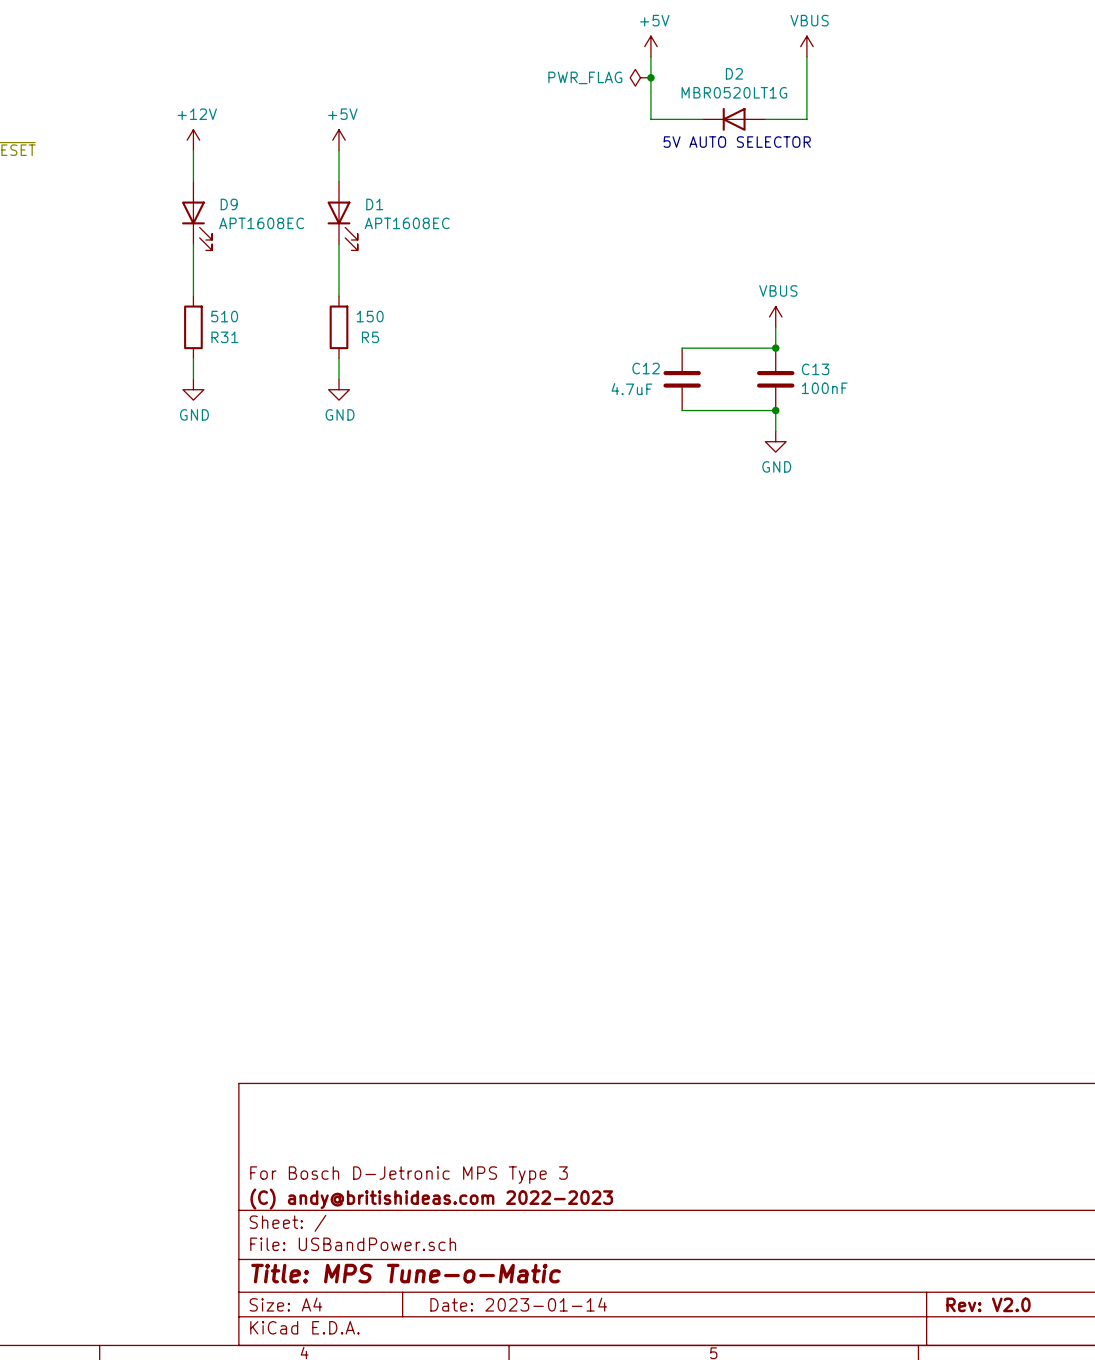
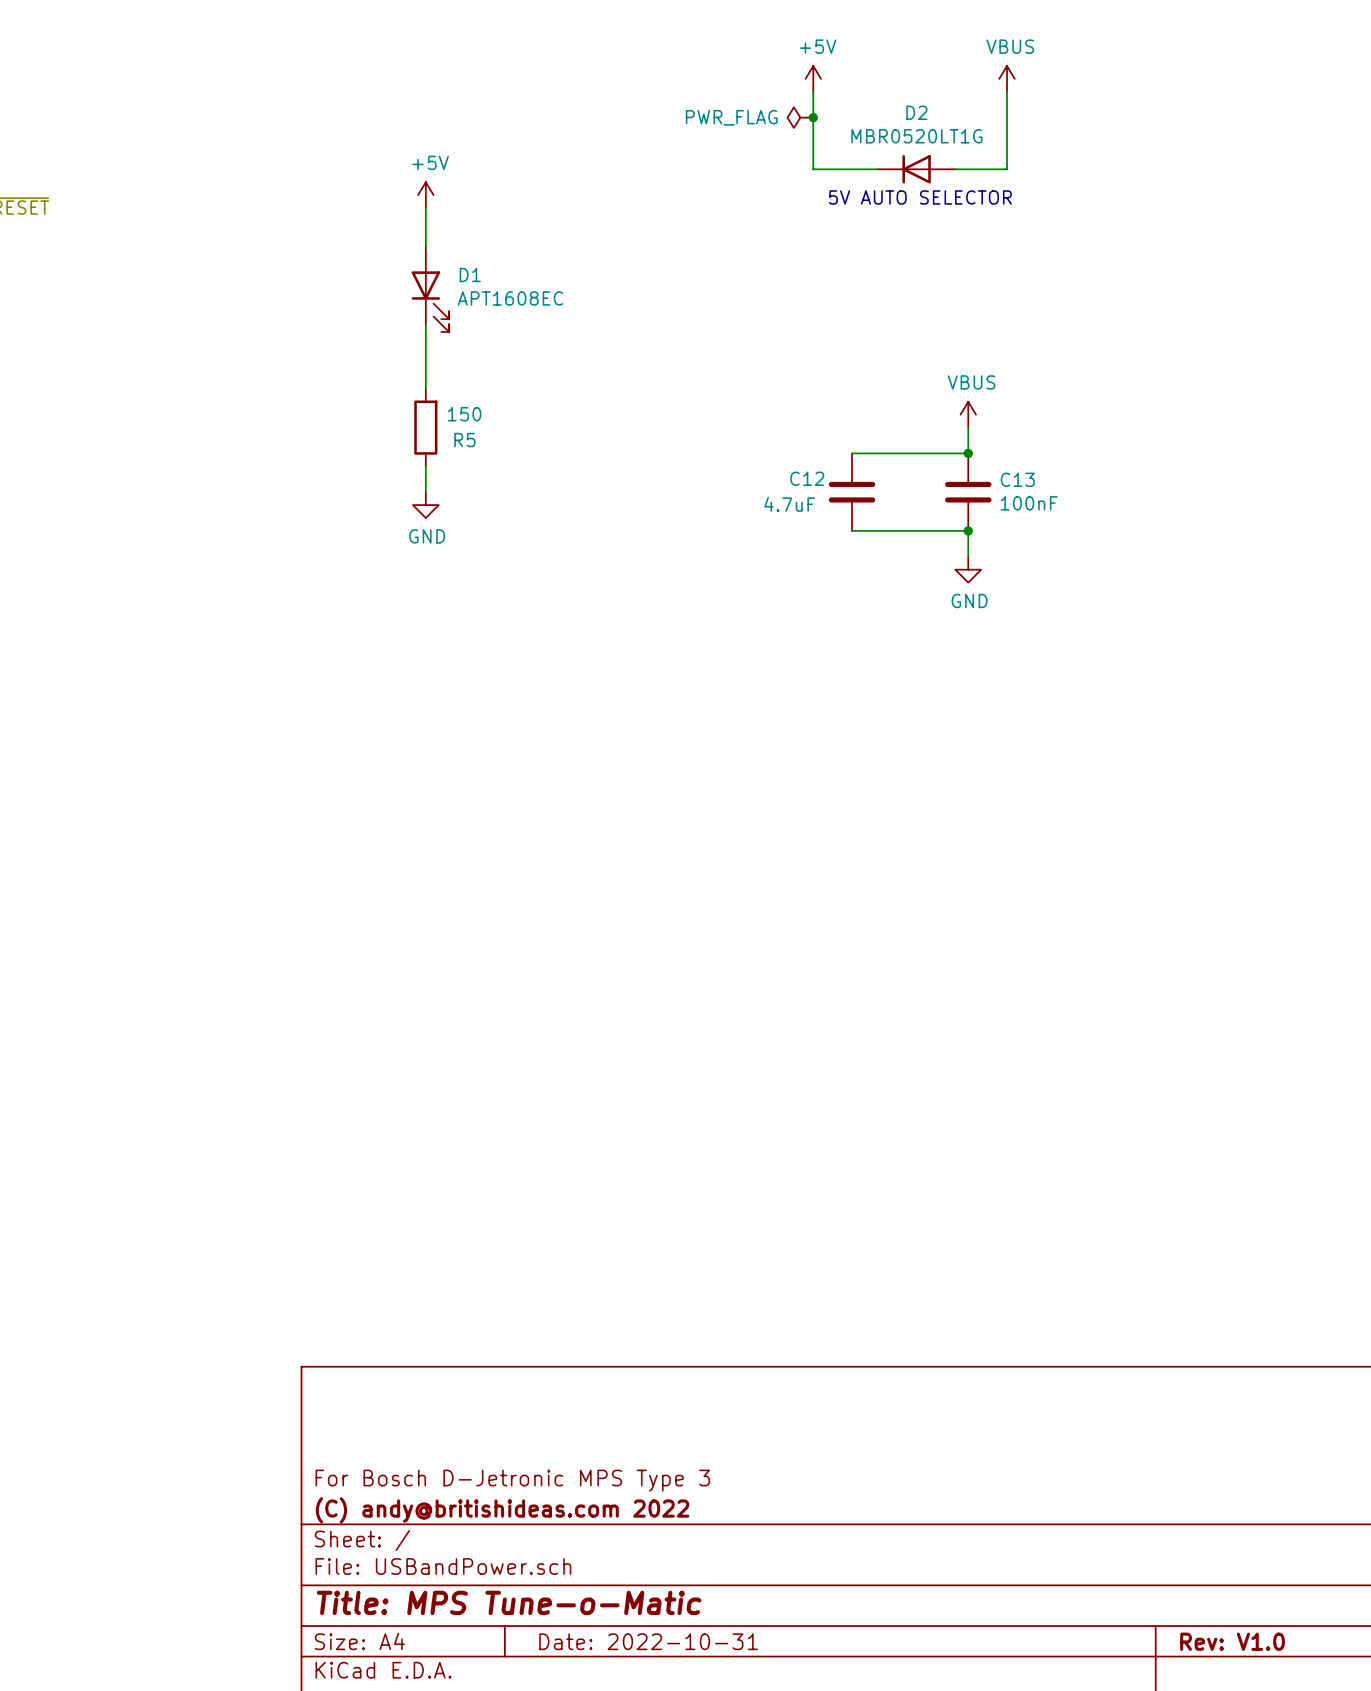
power symbol: +12V (193, 140) -> none
wire: (193, 150) (193, 181) -> none
D9: APT1608EC (197, 216) -> none
wire: (193, 244) (193, 296) -> none
R31: 510 (193, 327) -> none
wire: (193, 358) (193, 379) -> none
power symbol: GND (193, 389) -> none
title block: (C) andy@britishideas.com 2022-2023 (431, 1199) -> (C) andy@britishideas.com 2022 (502, 1510)
title block: Date: 2023-01-14 (518, 1304) -> Date: 2022-10-31 (648, 1641)
title block: Rev: V2.0 (988, 1304) -> Rev: V1.0 (1232, 1641)

